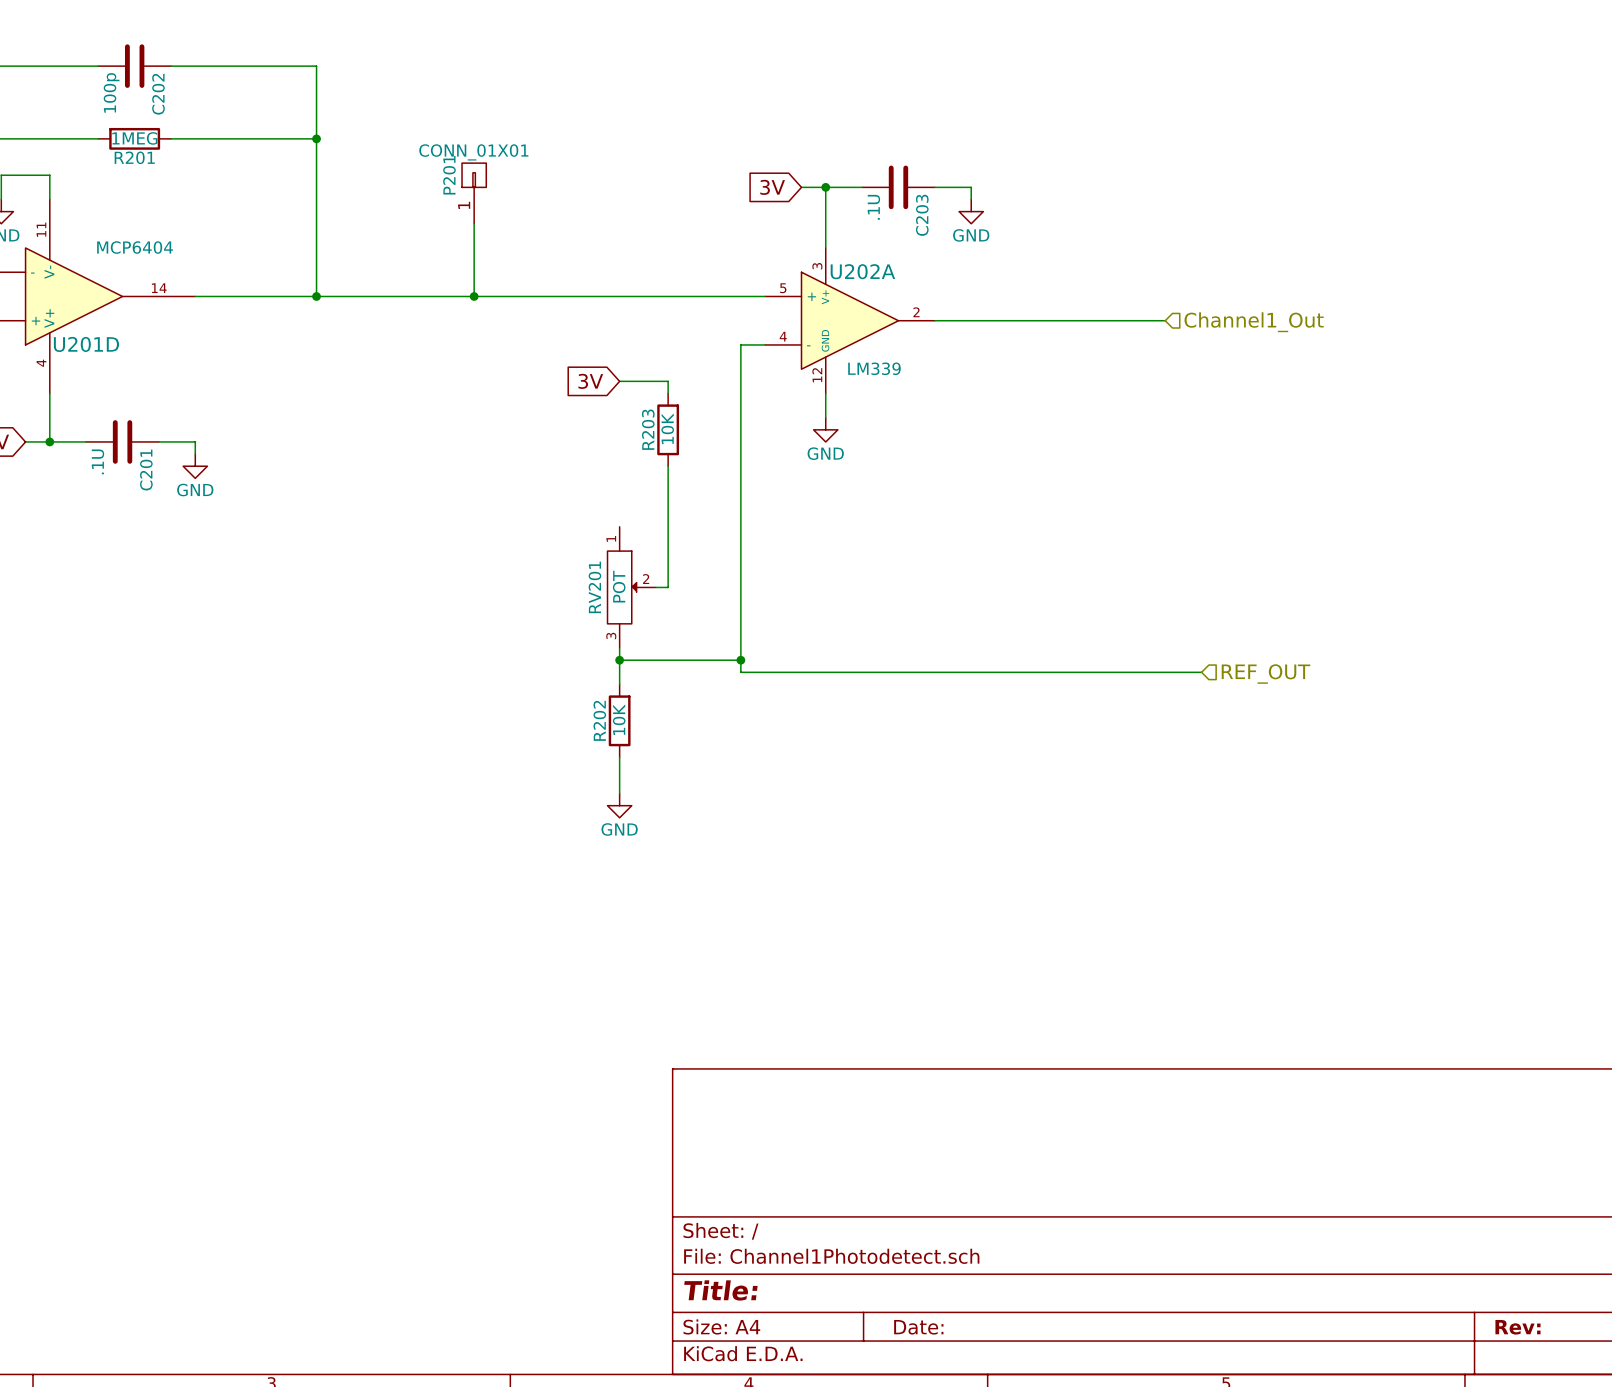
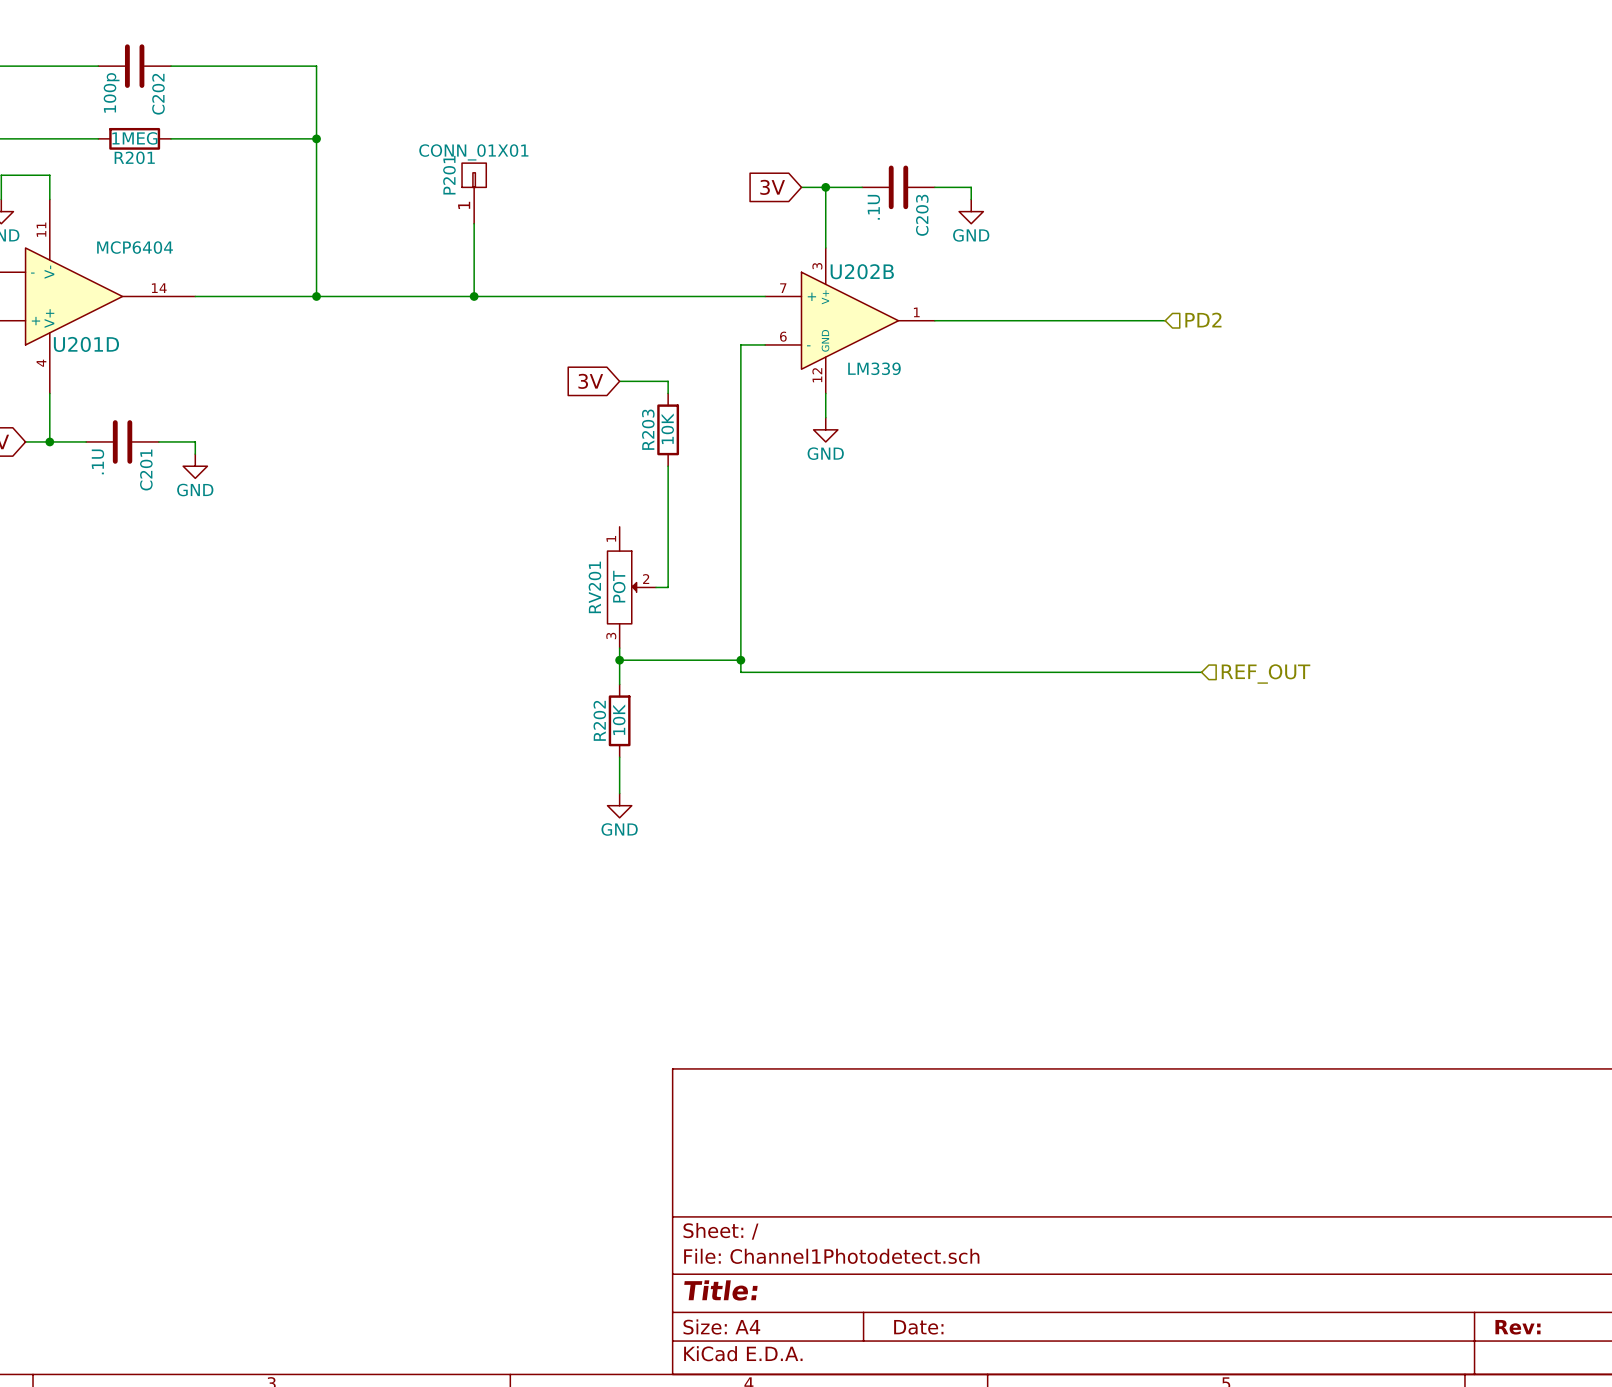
U202A name: U202A (862, 271) -> U202B (862, 271)
U202A pin number: 5 (783, 288) -> 7 (783, 288)
U202A pin number: 2 (916, 312) -> 1 (916, 312)
hierarchical label: Channel1_Out (1254, 322) -> PD2 (1203, 320)
U202A pin number: 4 (783, 336) -> 6 (783, 336)

